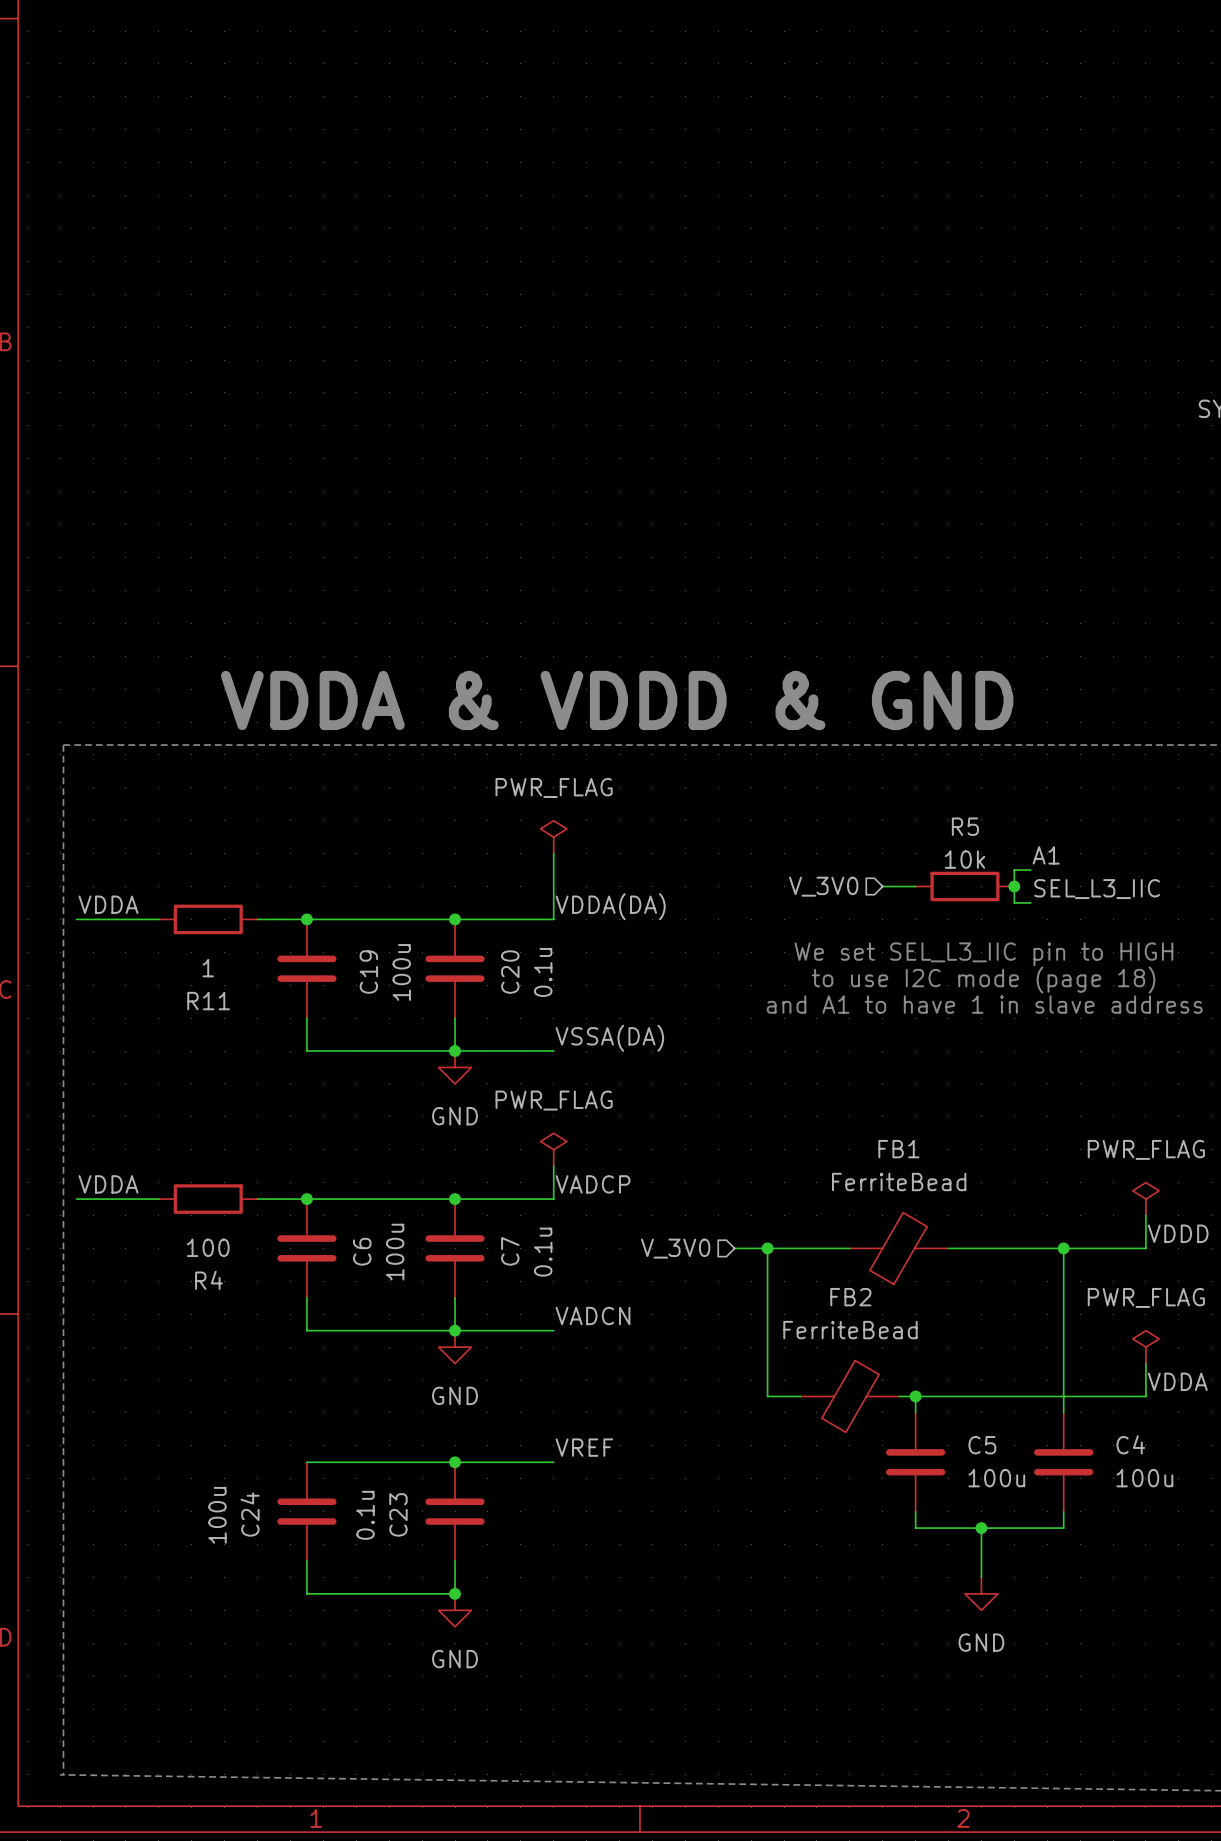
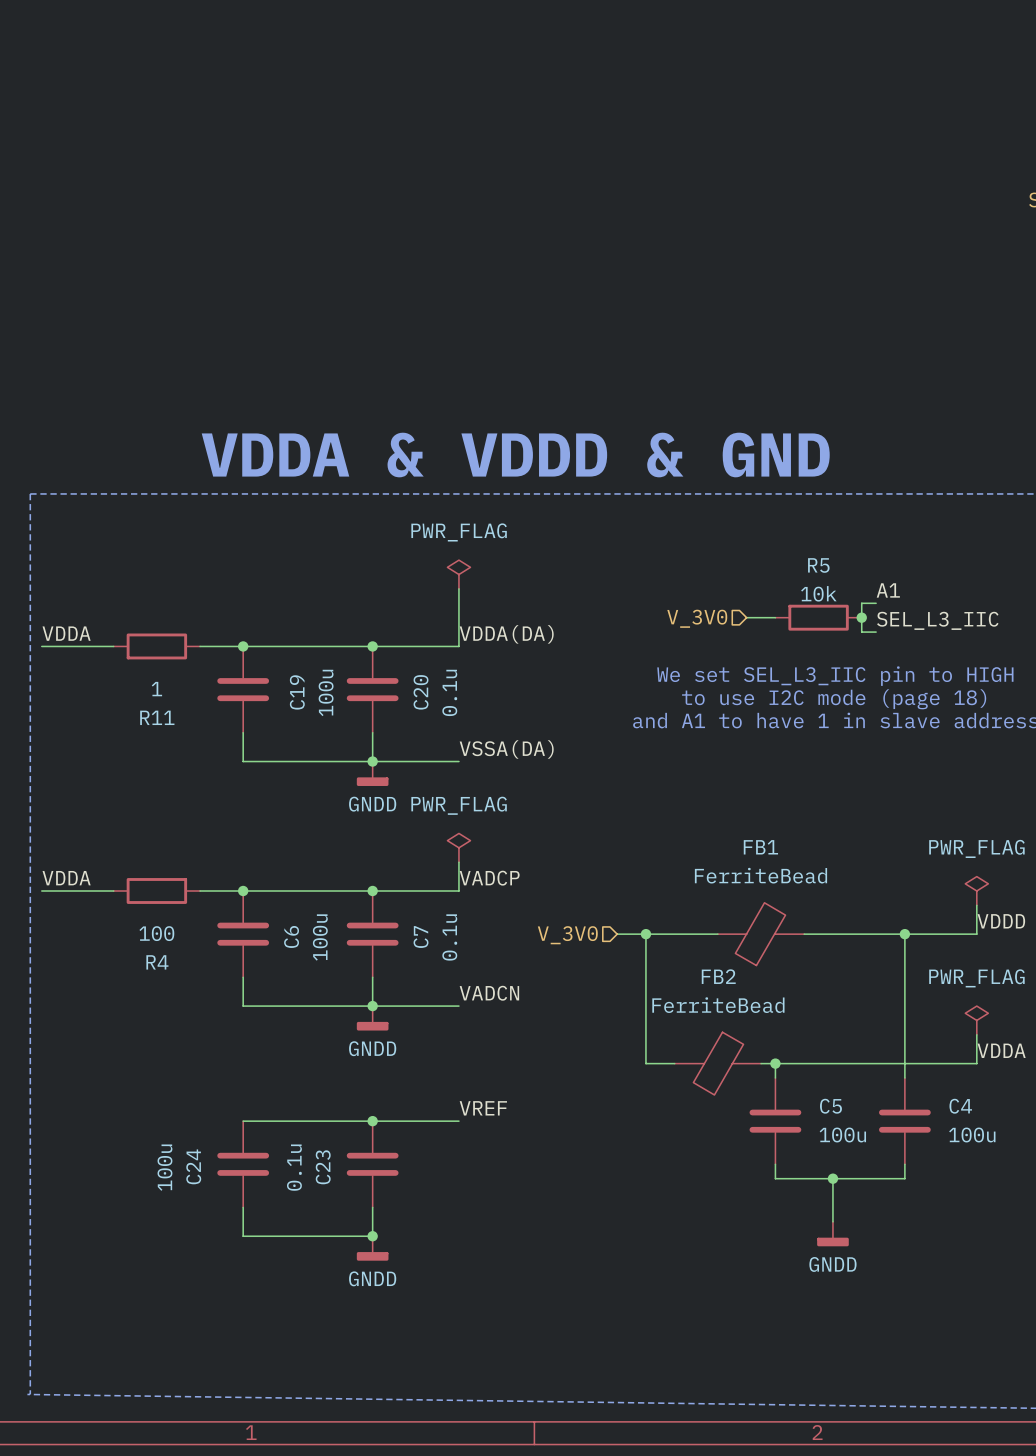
power symbol: GND (455, 1067) -> GNDD (372, 773)
power symbol: GND (455, 1347) -> GNDD (372, 1018)
power symbol: GND (981, 1593) -> GNDD (832, 1234)
power symbol: GND (455, 1610) -> GNDD (372, 1248)

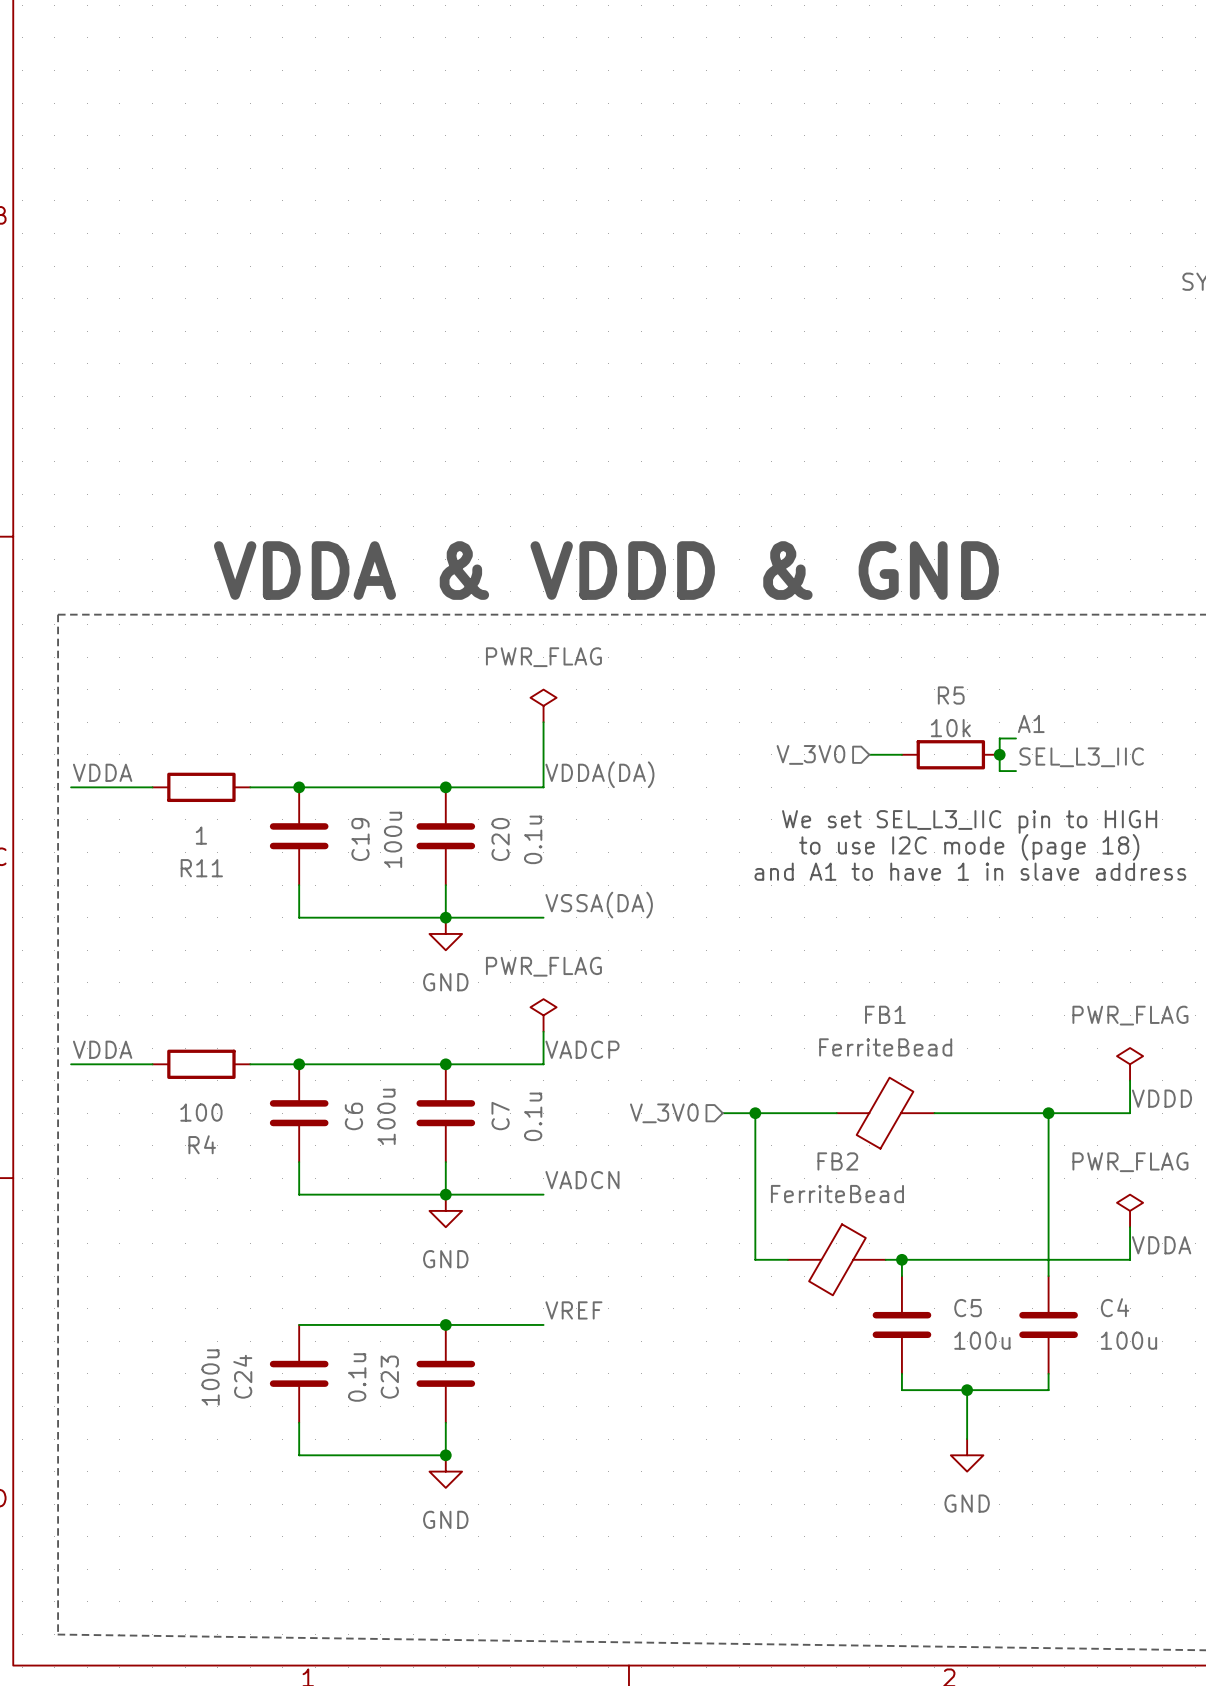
power symbol: GNDD (372, 773) -> GND (445, 933)
power symbol: GNDD (372, 1018) -> GND (445, 1210)
power symbol: GNDD (832, 1234) -> GND (967, 1455)
power symbol: GNDD (372, 1248) -> GND (445, 1471)

